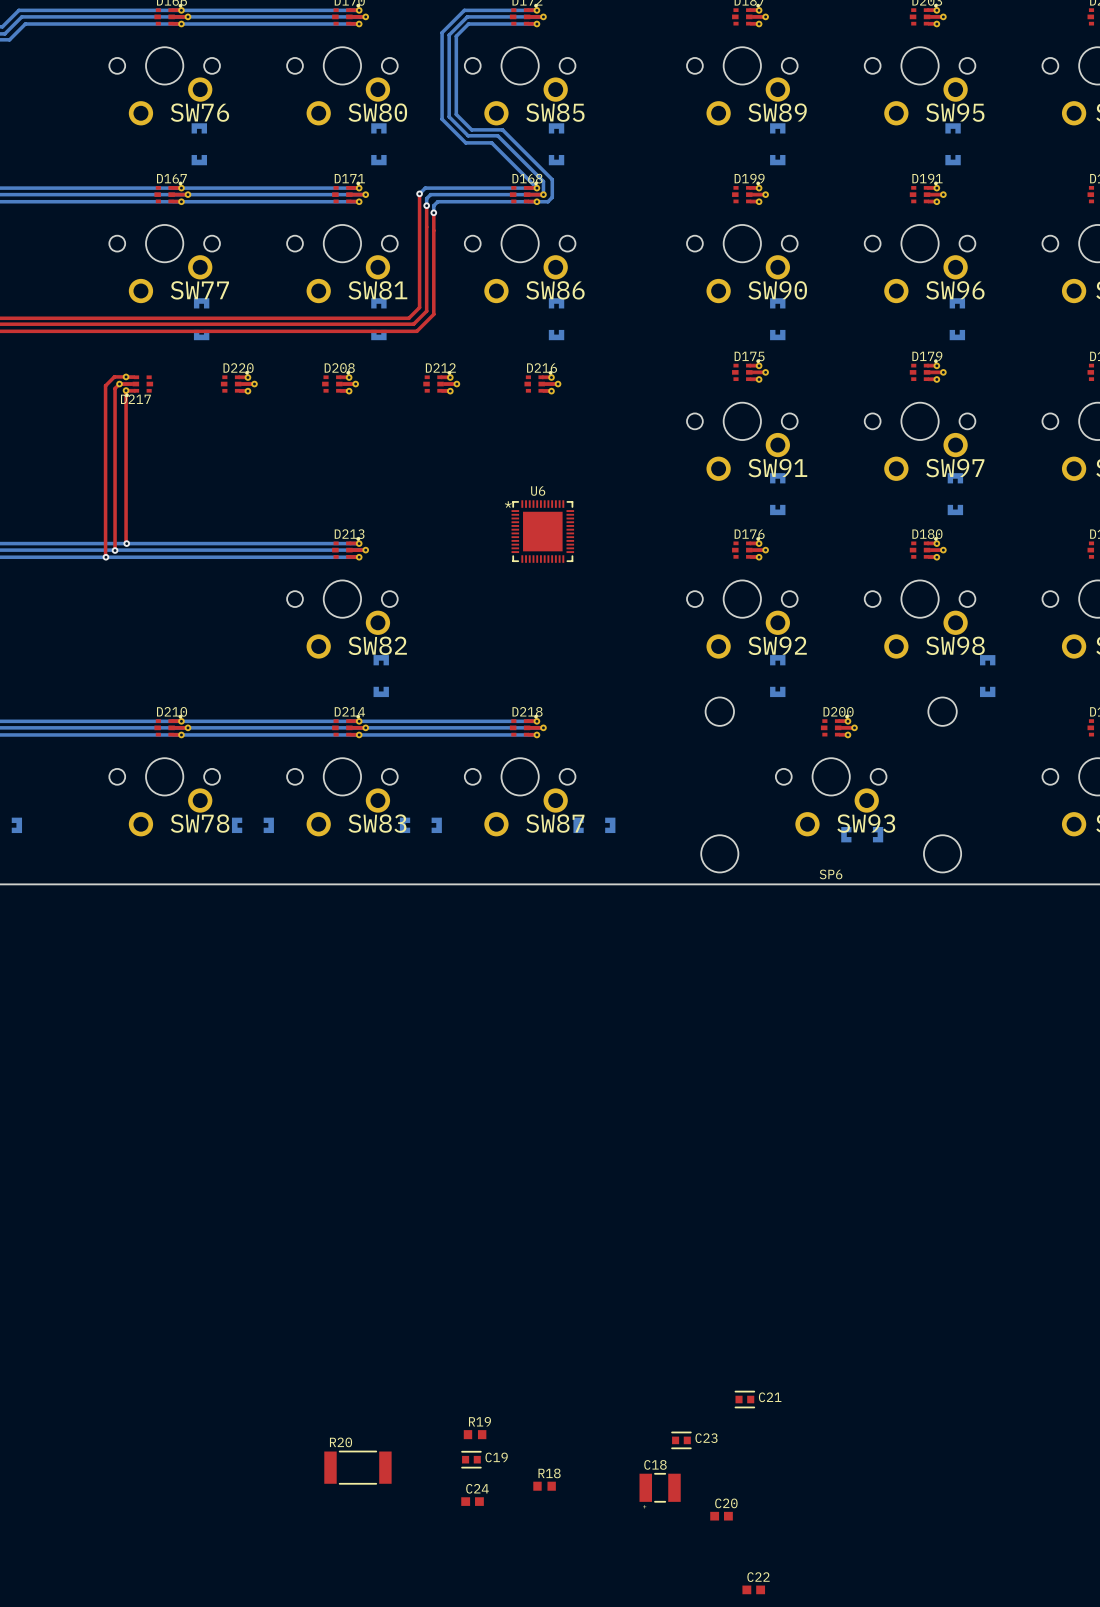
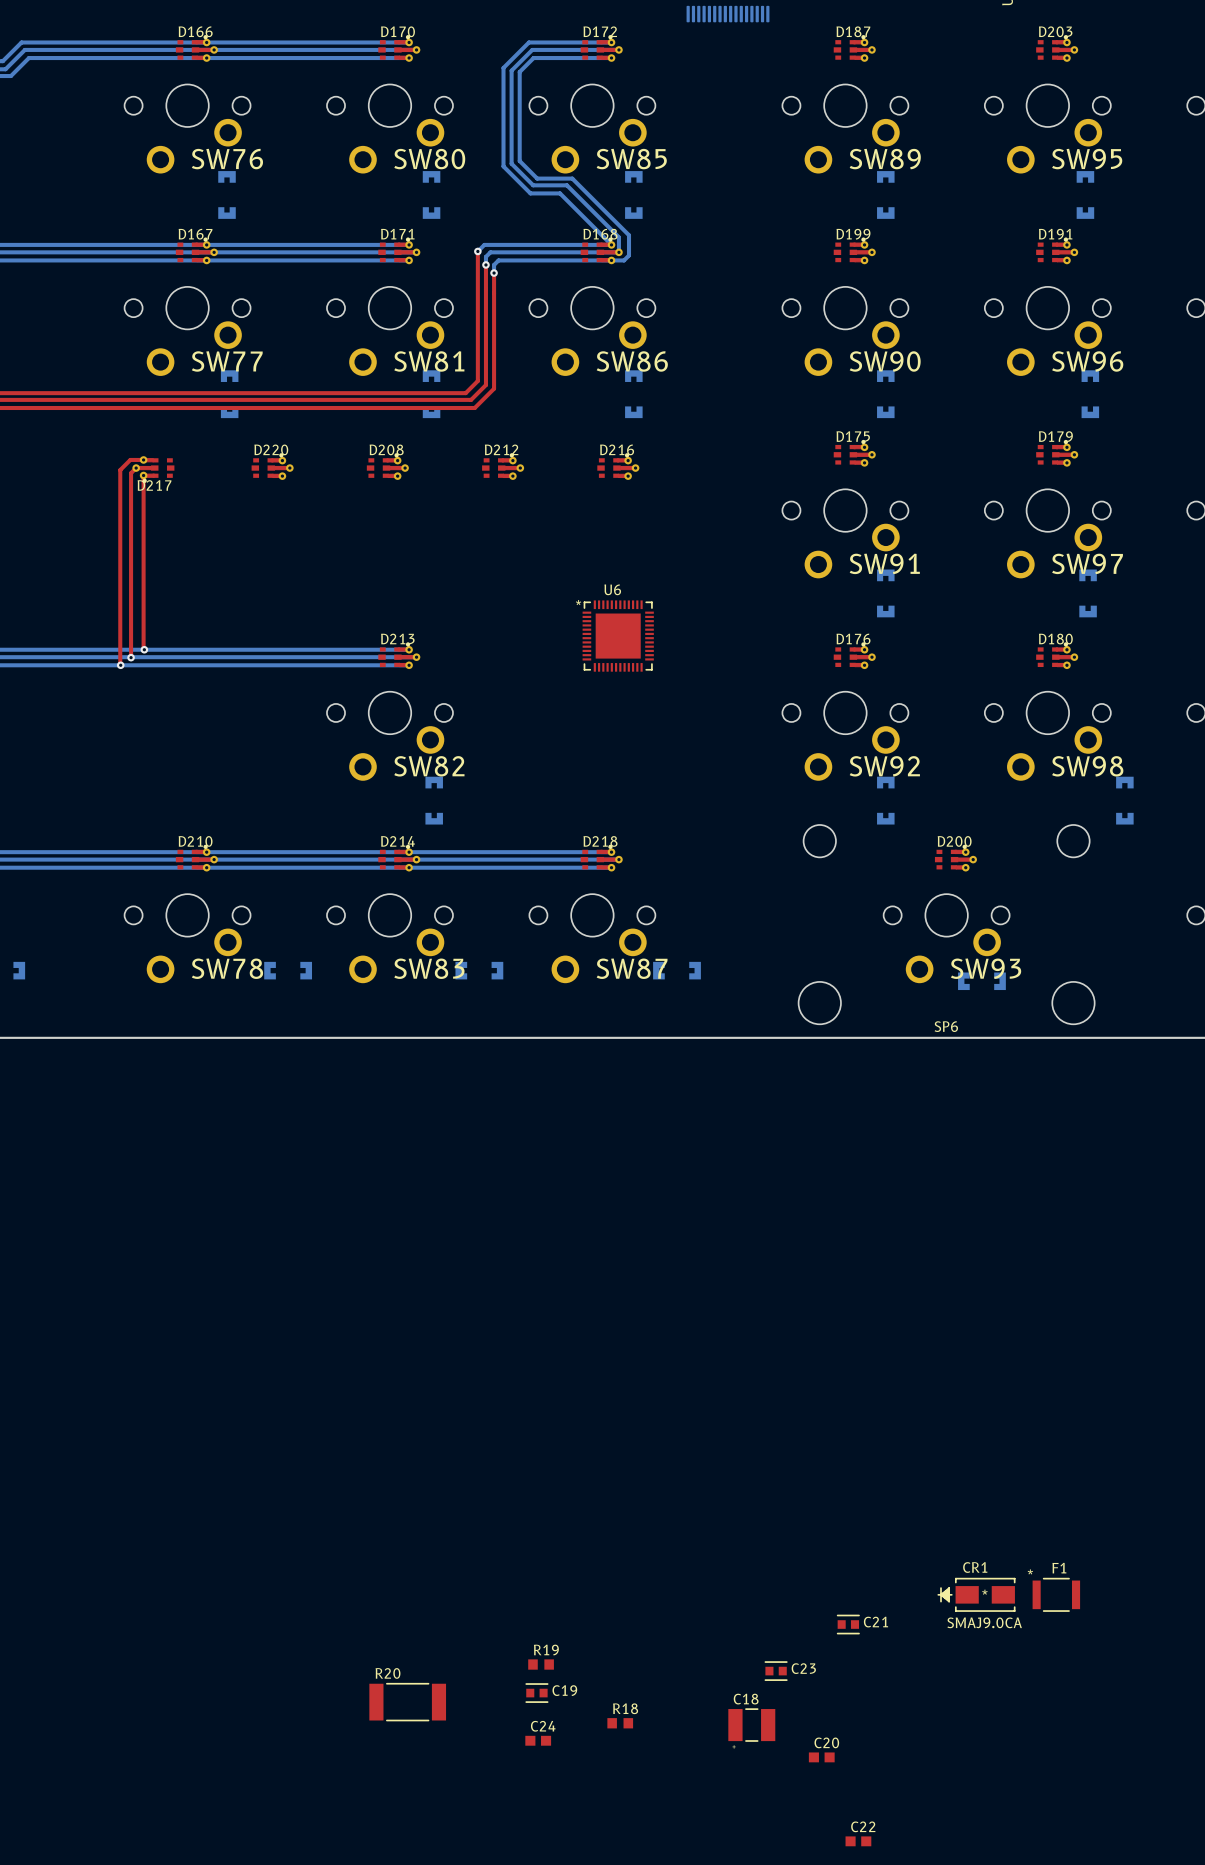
CR1: none -> SMAJ9.0CA (976, 1594)
F1: none -> (1056, 1594)

